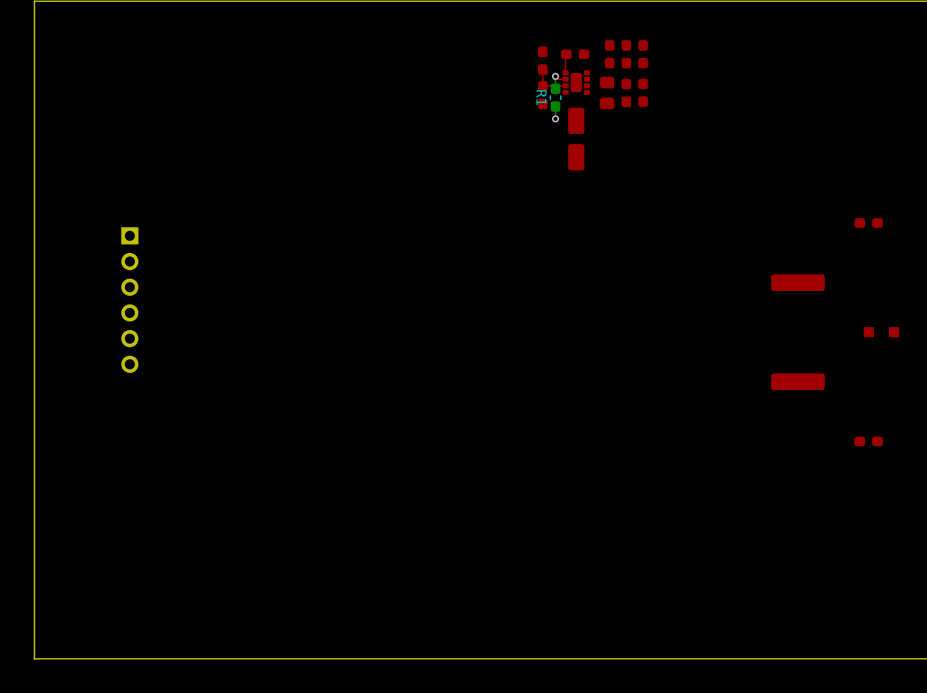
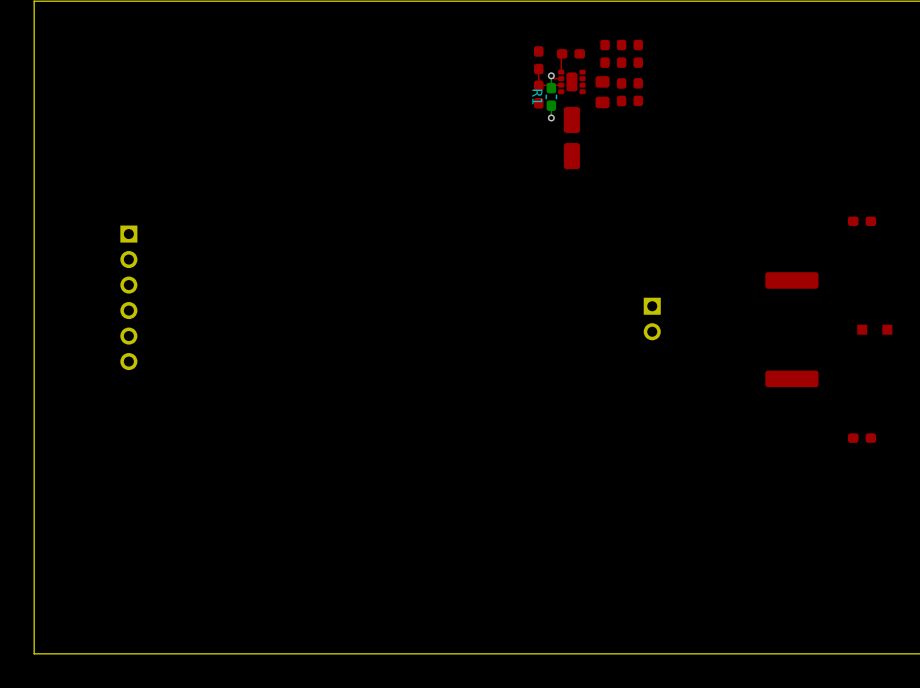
part: none -> (652, 318)

